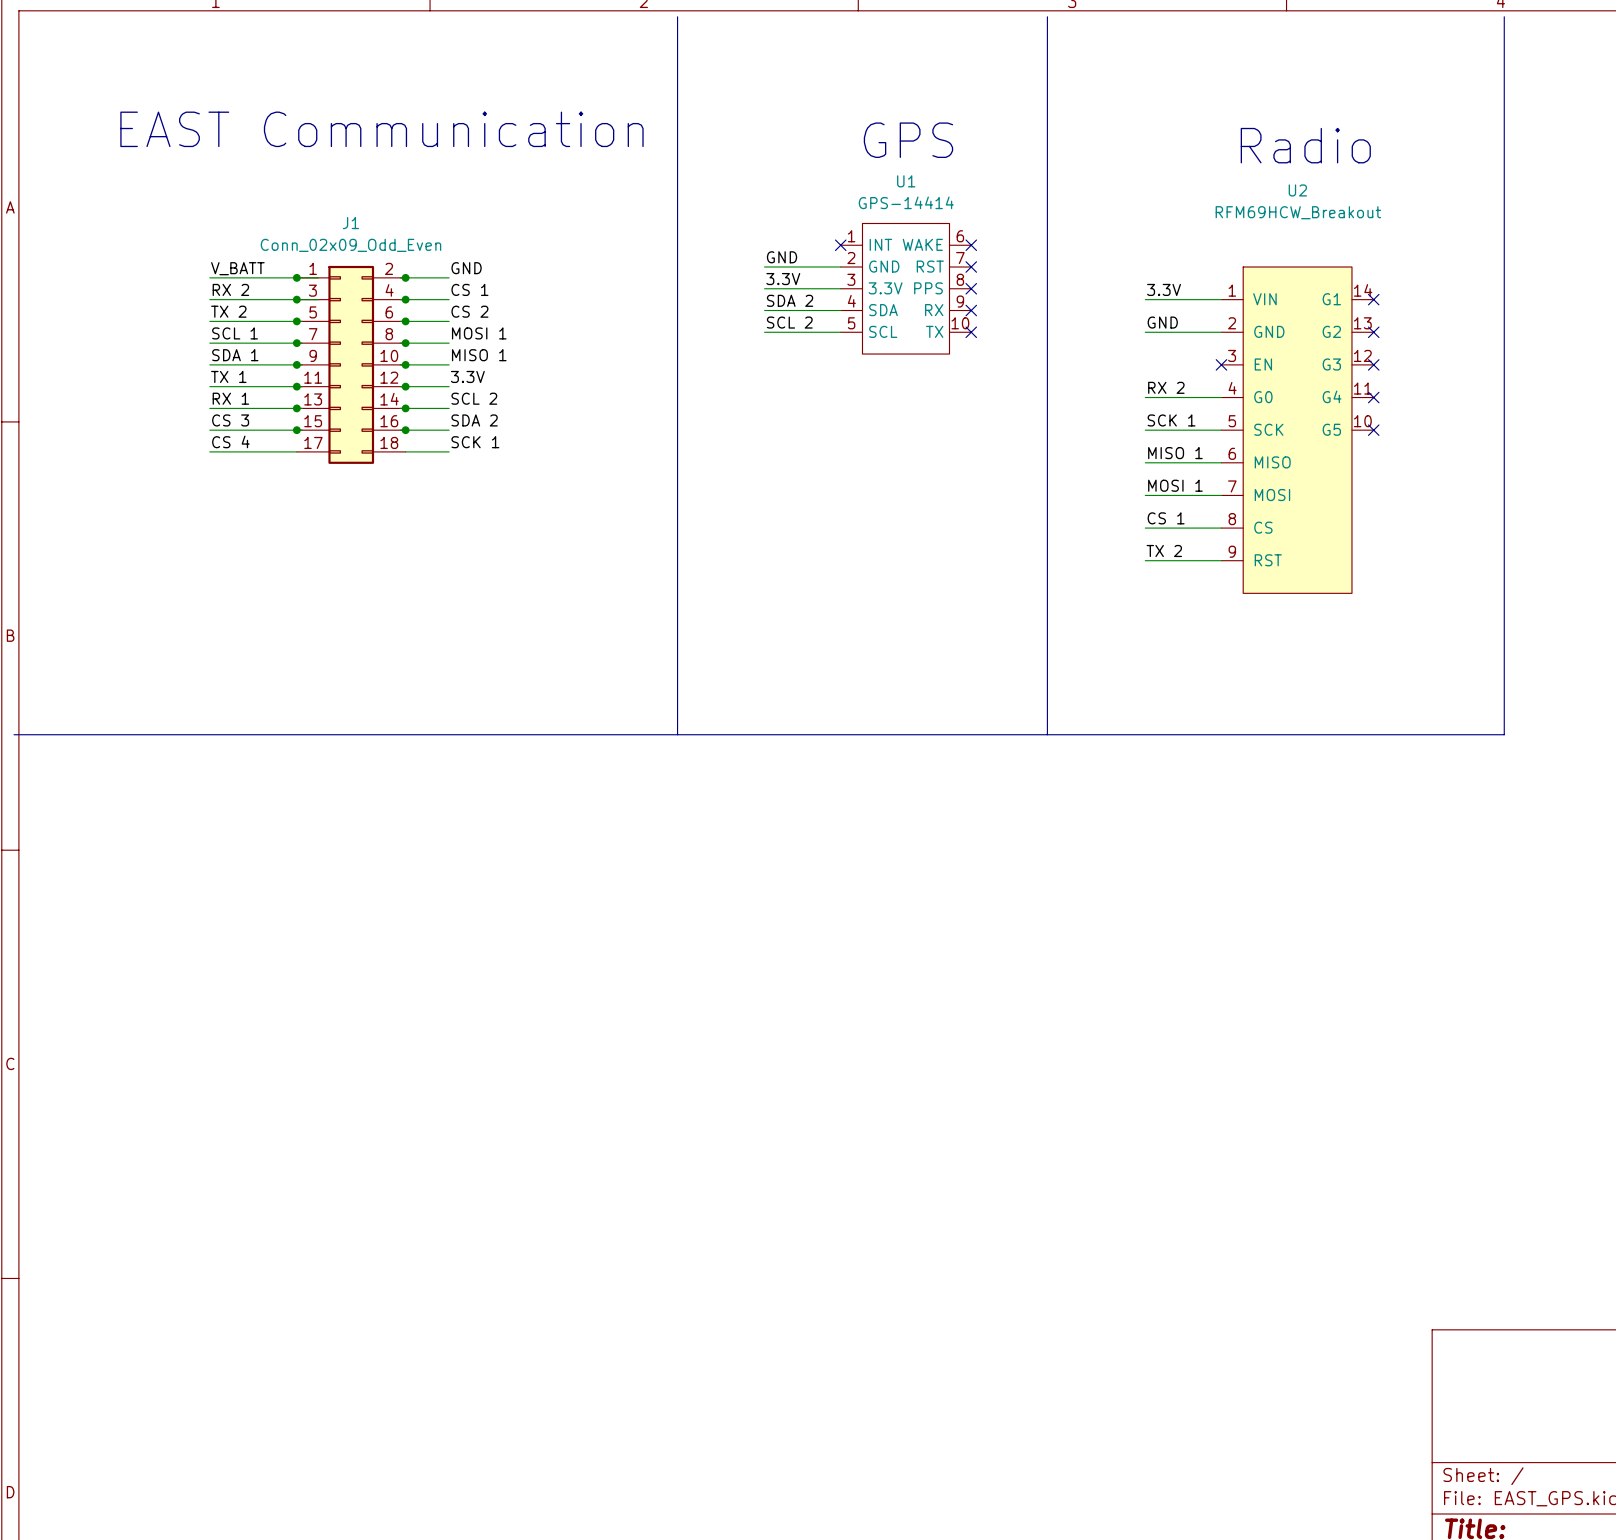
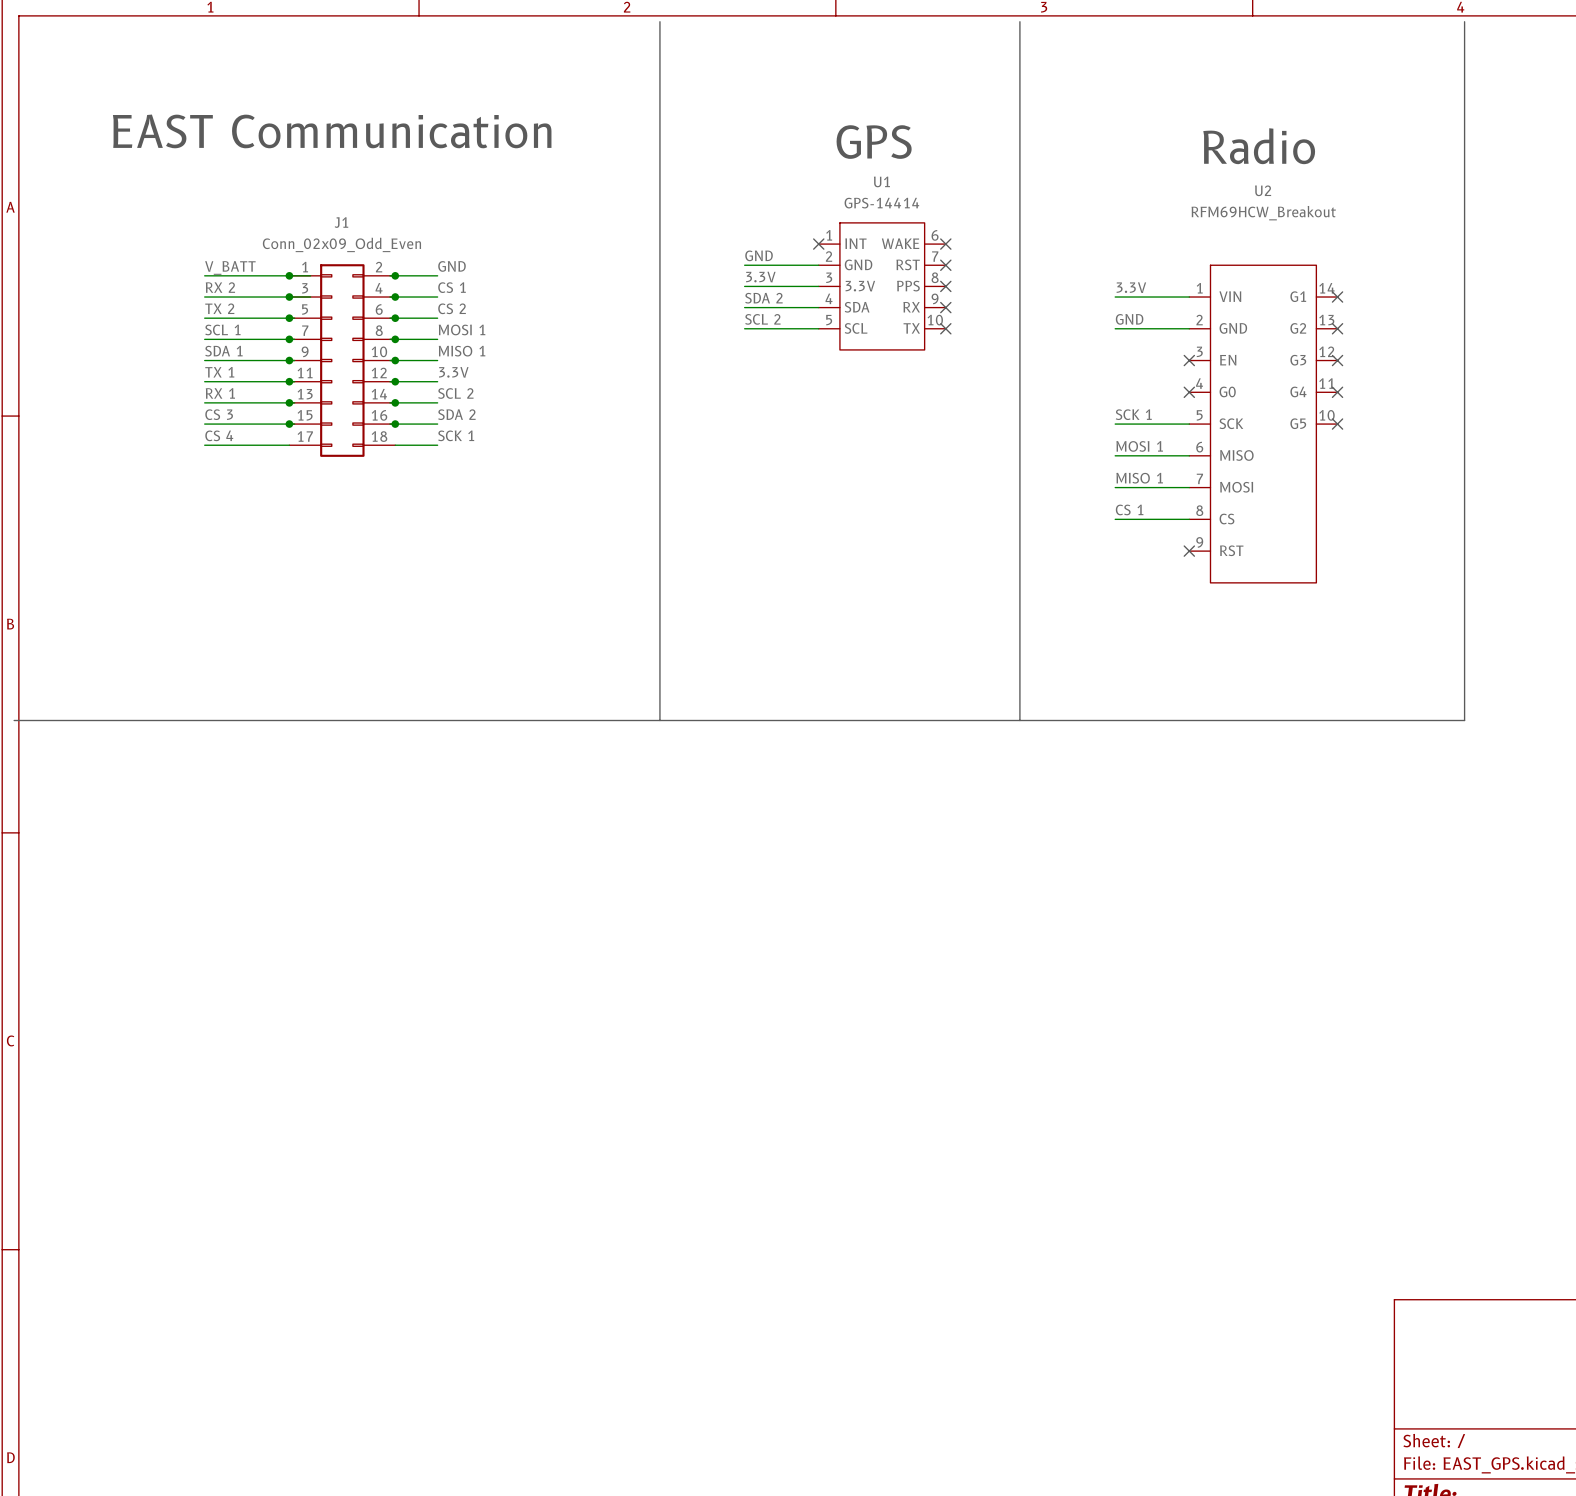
label: RX 2 (1166, 387) -> none
wire: (1145, 397) (1221, 397) -> none
no-connect mark: none -> (1189, 392)
label: MISO 1 (1175, 453) -> MOSI 1 (1139, 446)
label: MOSI 1 (1175, 485) -> MISO 1 (1139, 478)
label: TX 2 (1164, 550) -> none
wire: (1145, 560) (1221, 560) -> none
no-connect mark: none -> (1189, 551)

